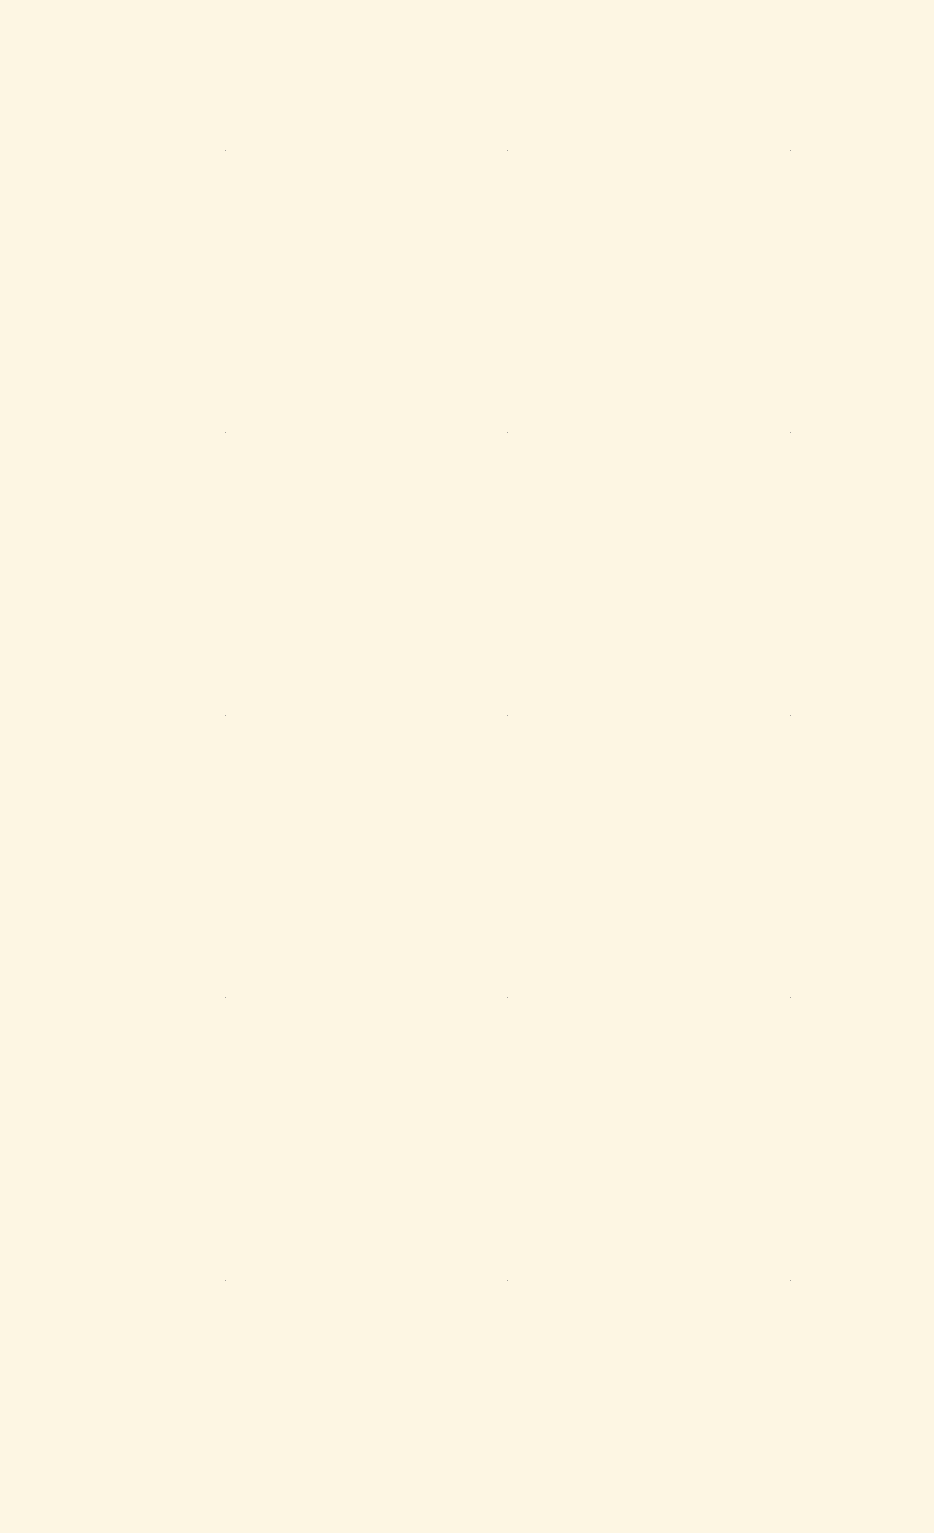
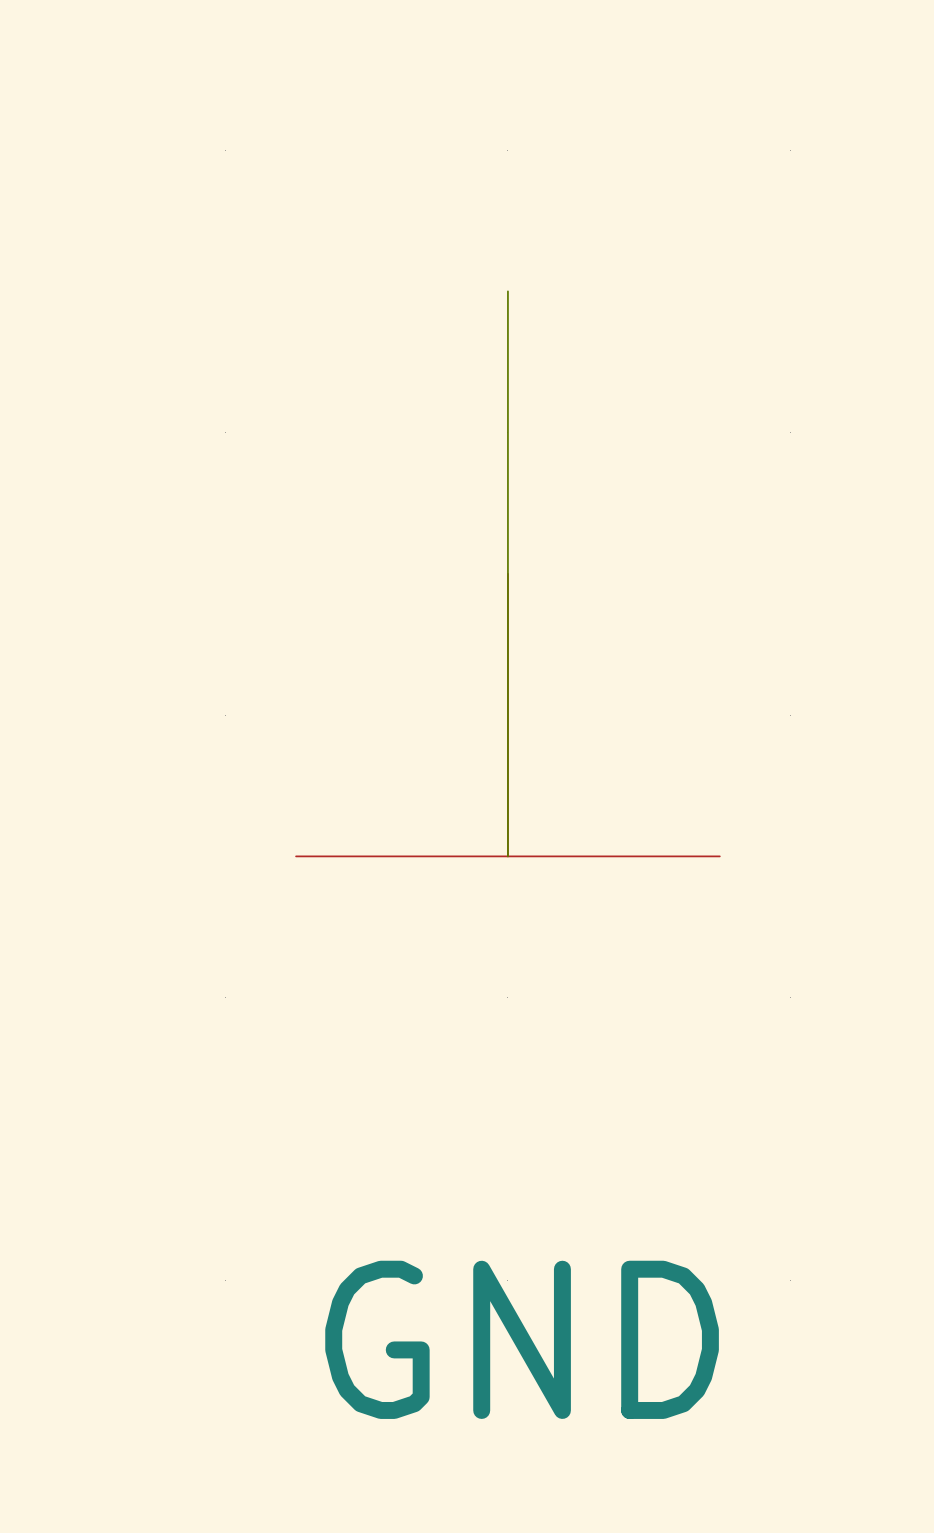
wire: none -> (507, 291) (507, 856)
power symbol: none -> GND (507, 715)

